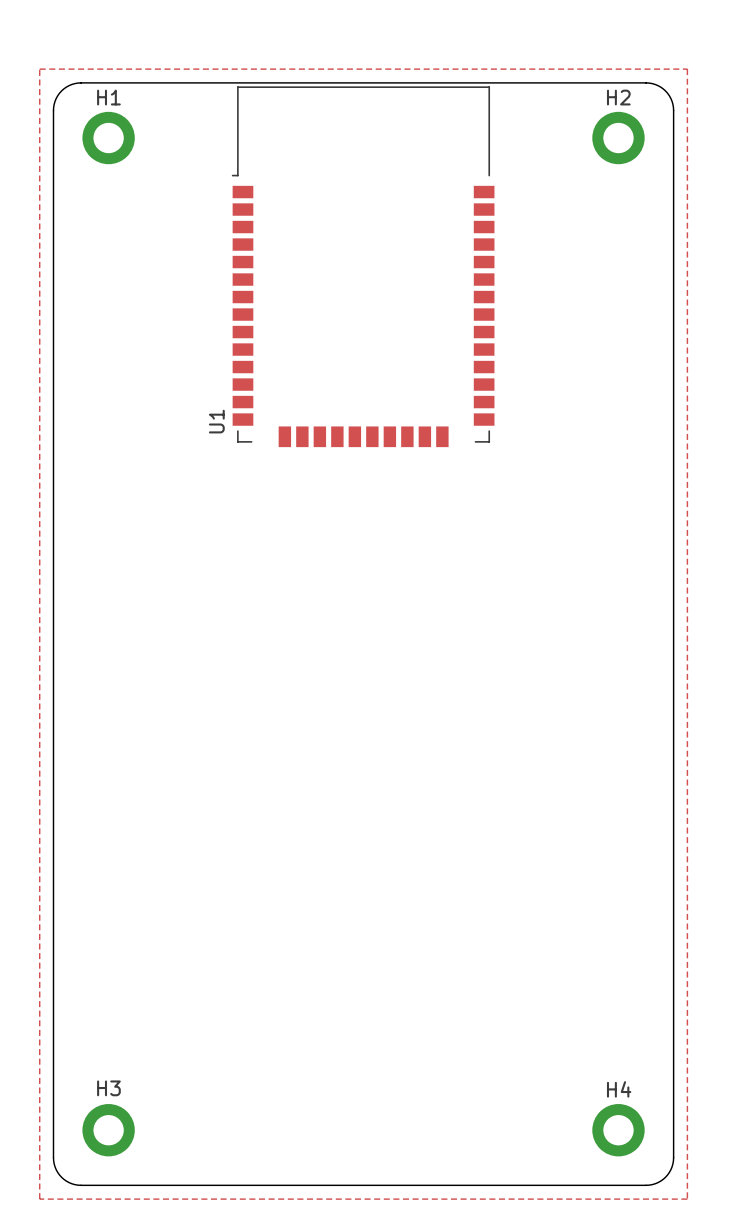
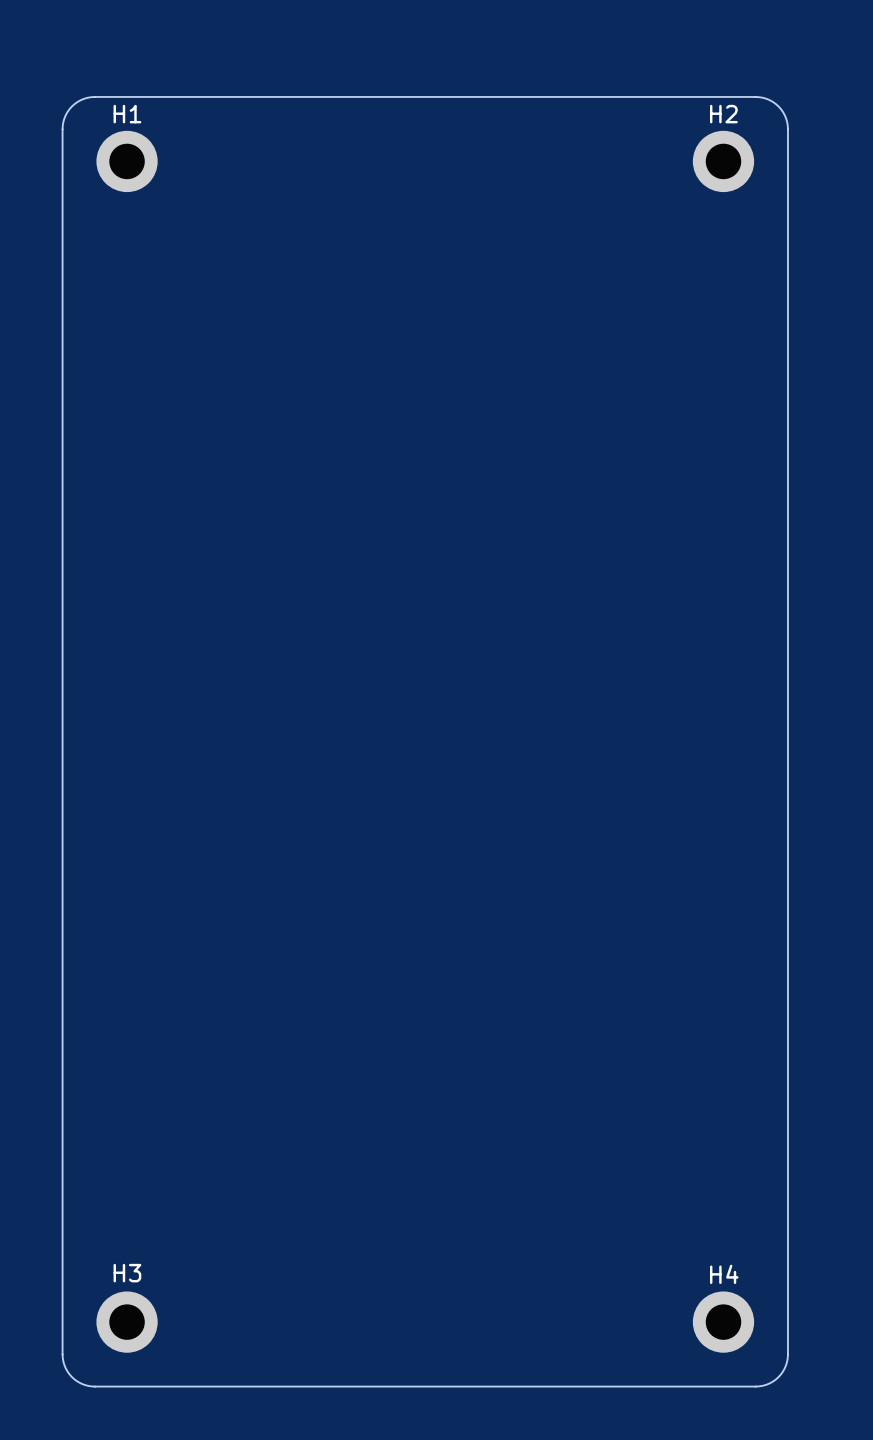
zone outline: (39, 69) (687, 69) (687, 1199) (39, 1199) (39, 69) -> none
U1: (363, 266) -> none

